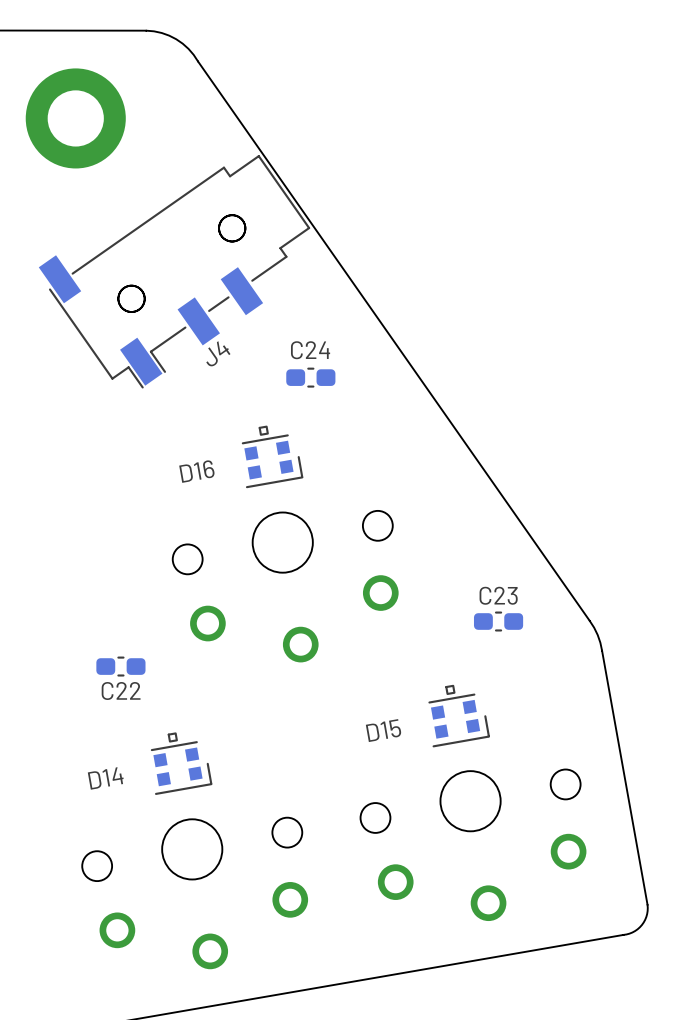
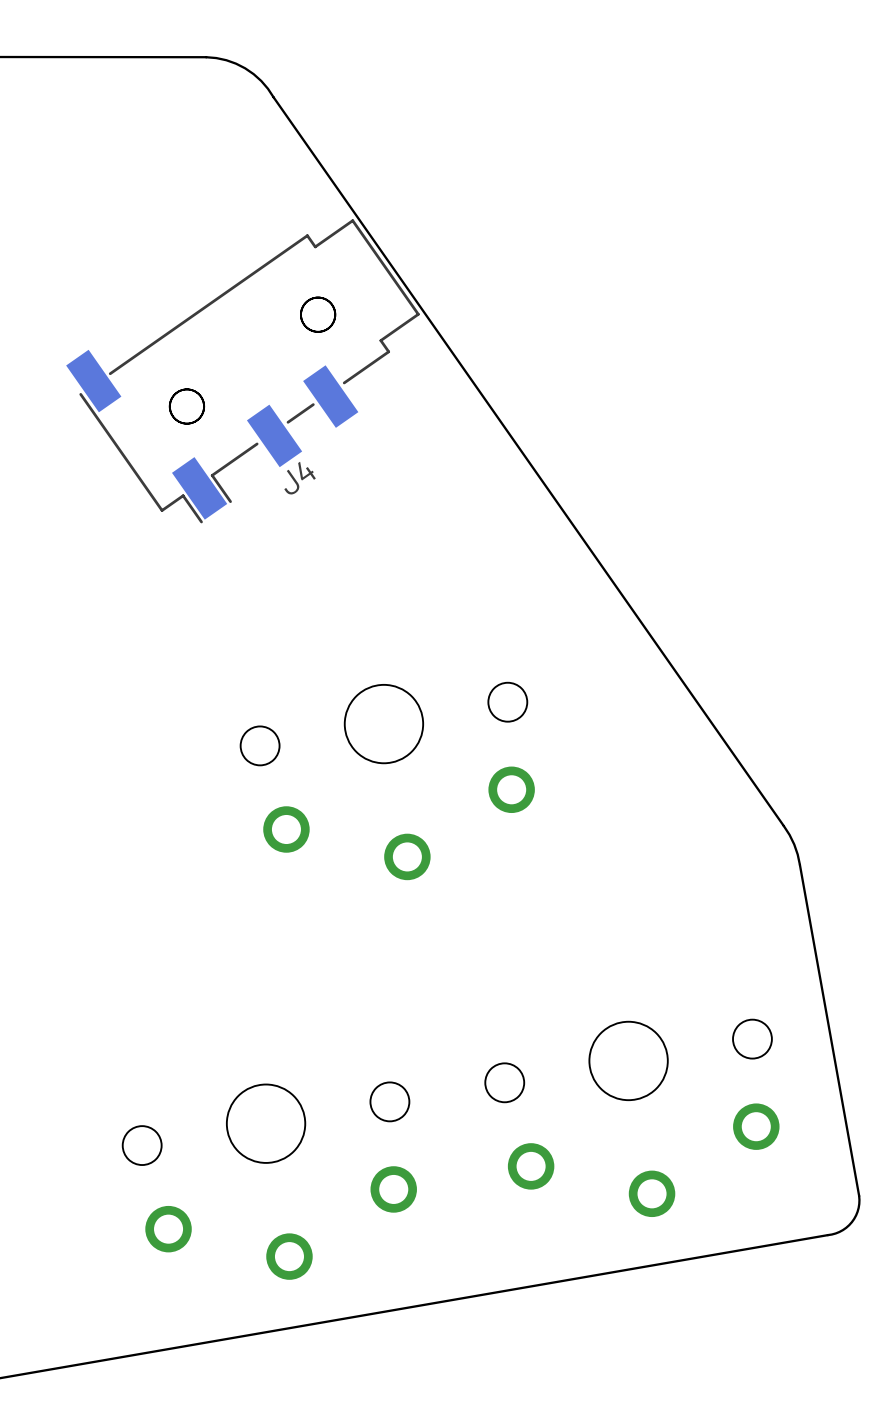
part: (75, 118) -> none
C24: (310, 377) -> none
D16: (272, 456) -> none
C23: (498, 621) -> none
C22: (120, 666) -> none
D15: (459, 716) -> none
D14: (181, 763) -> none

